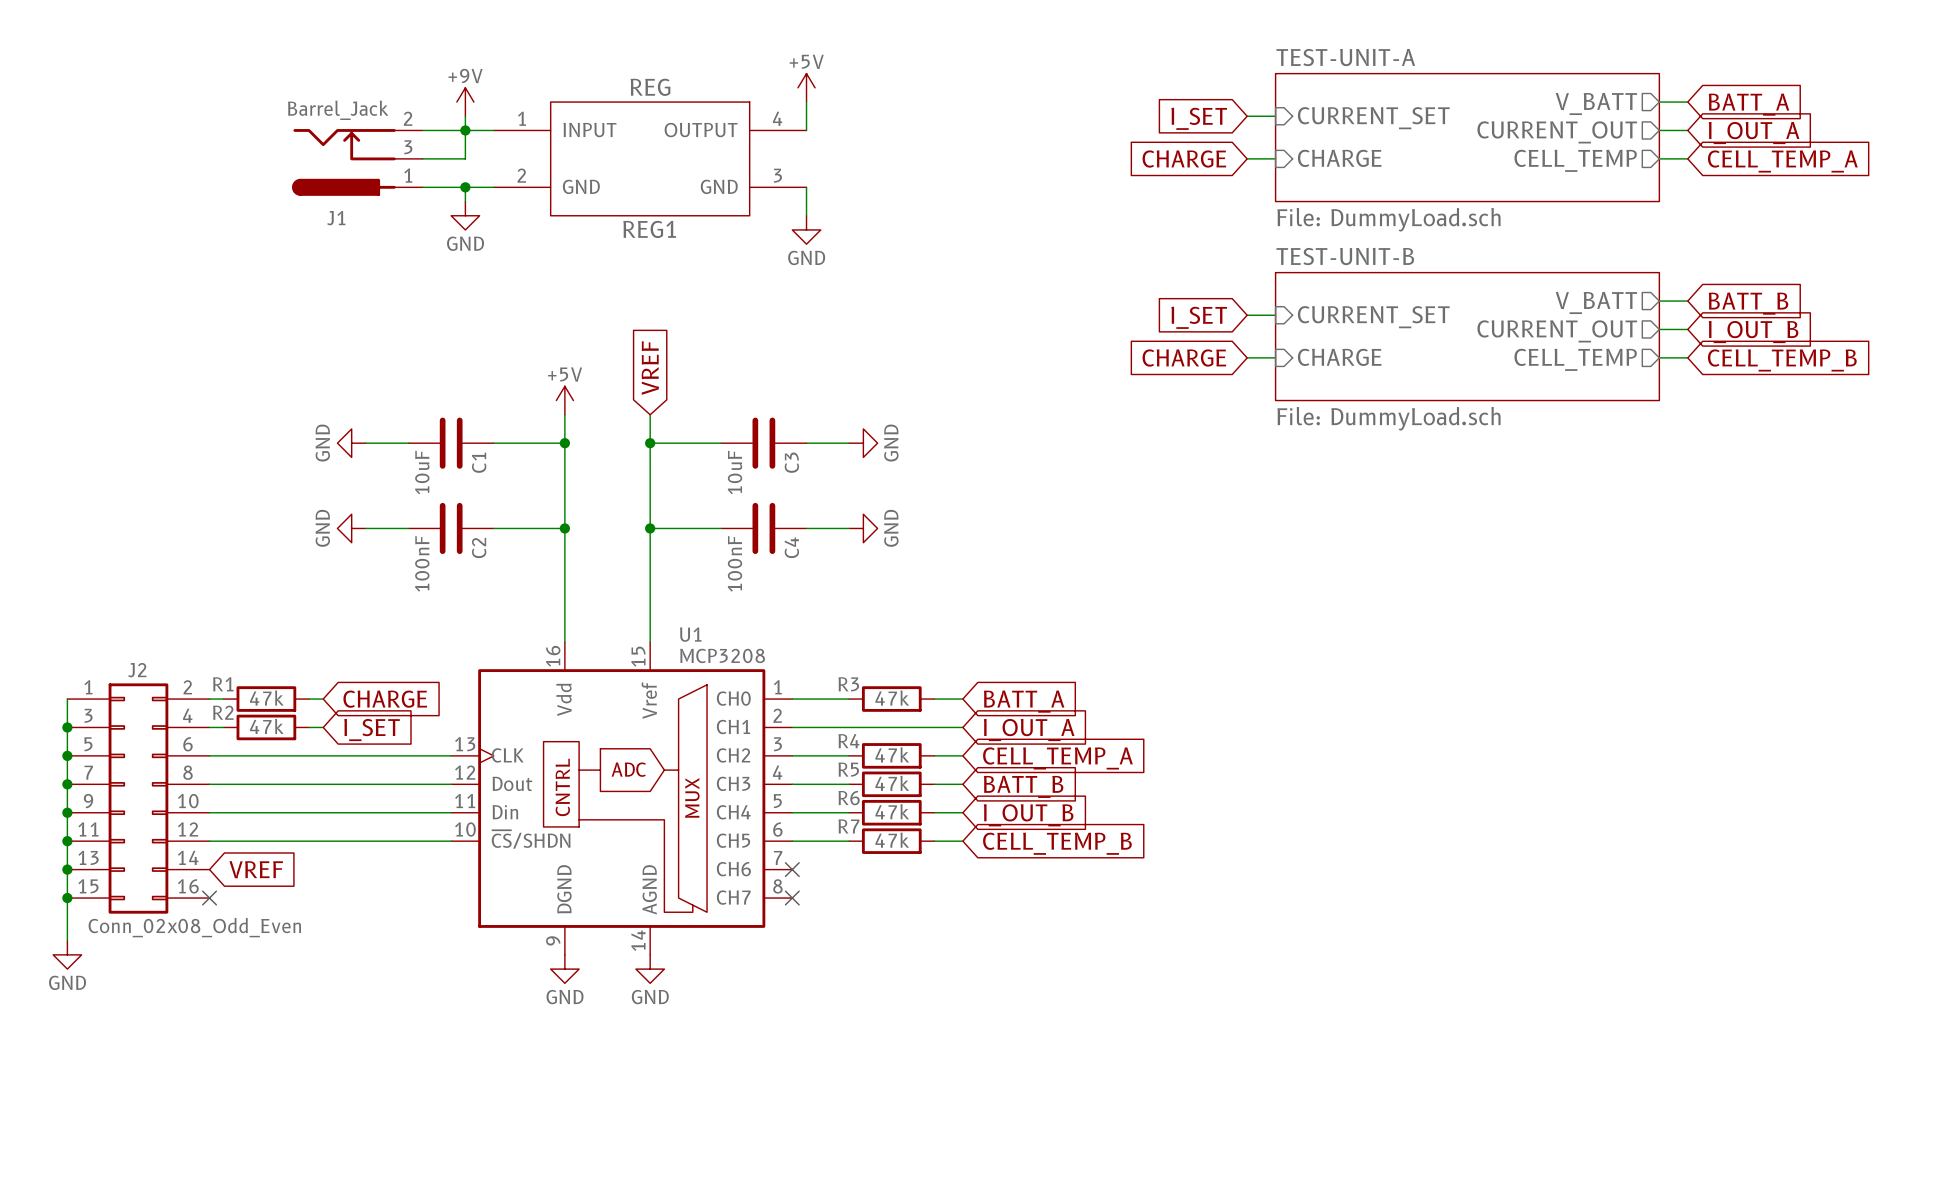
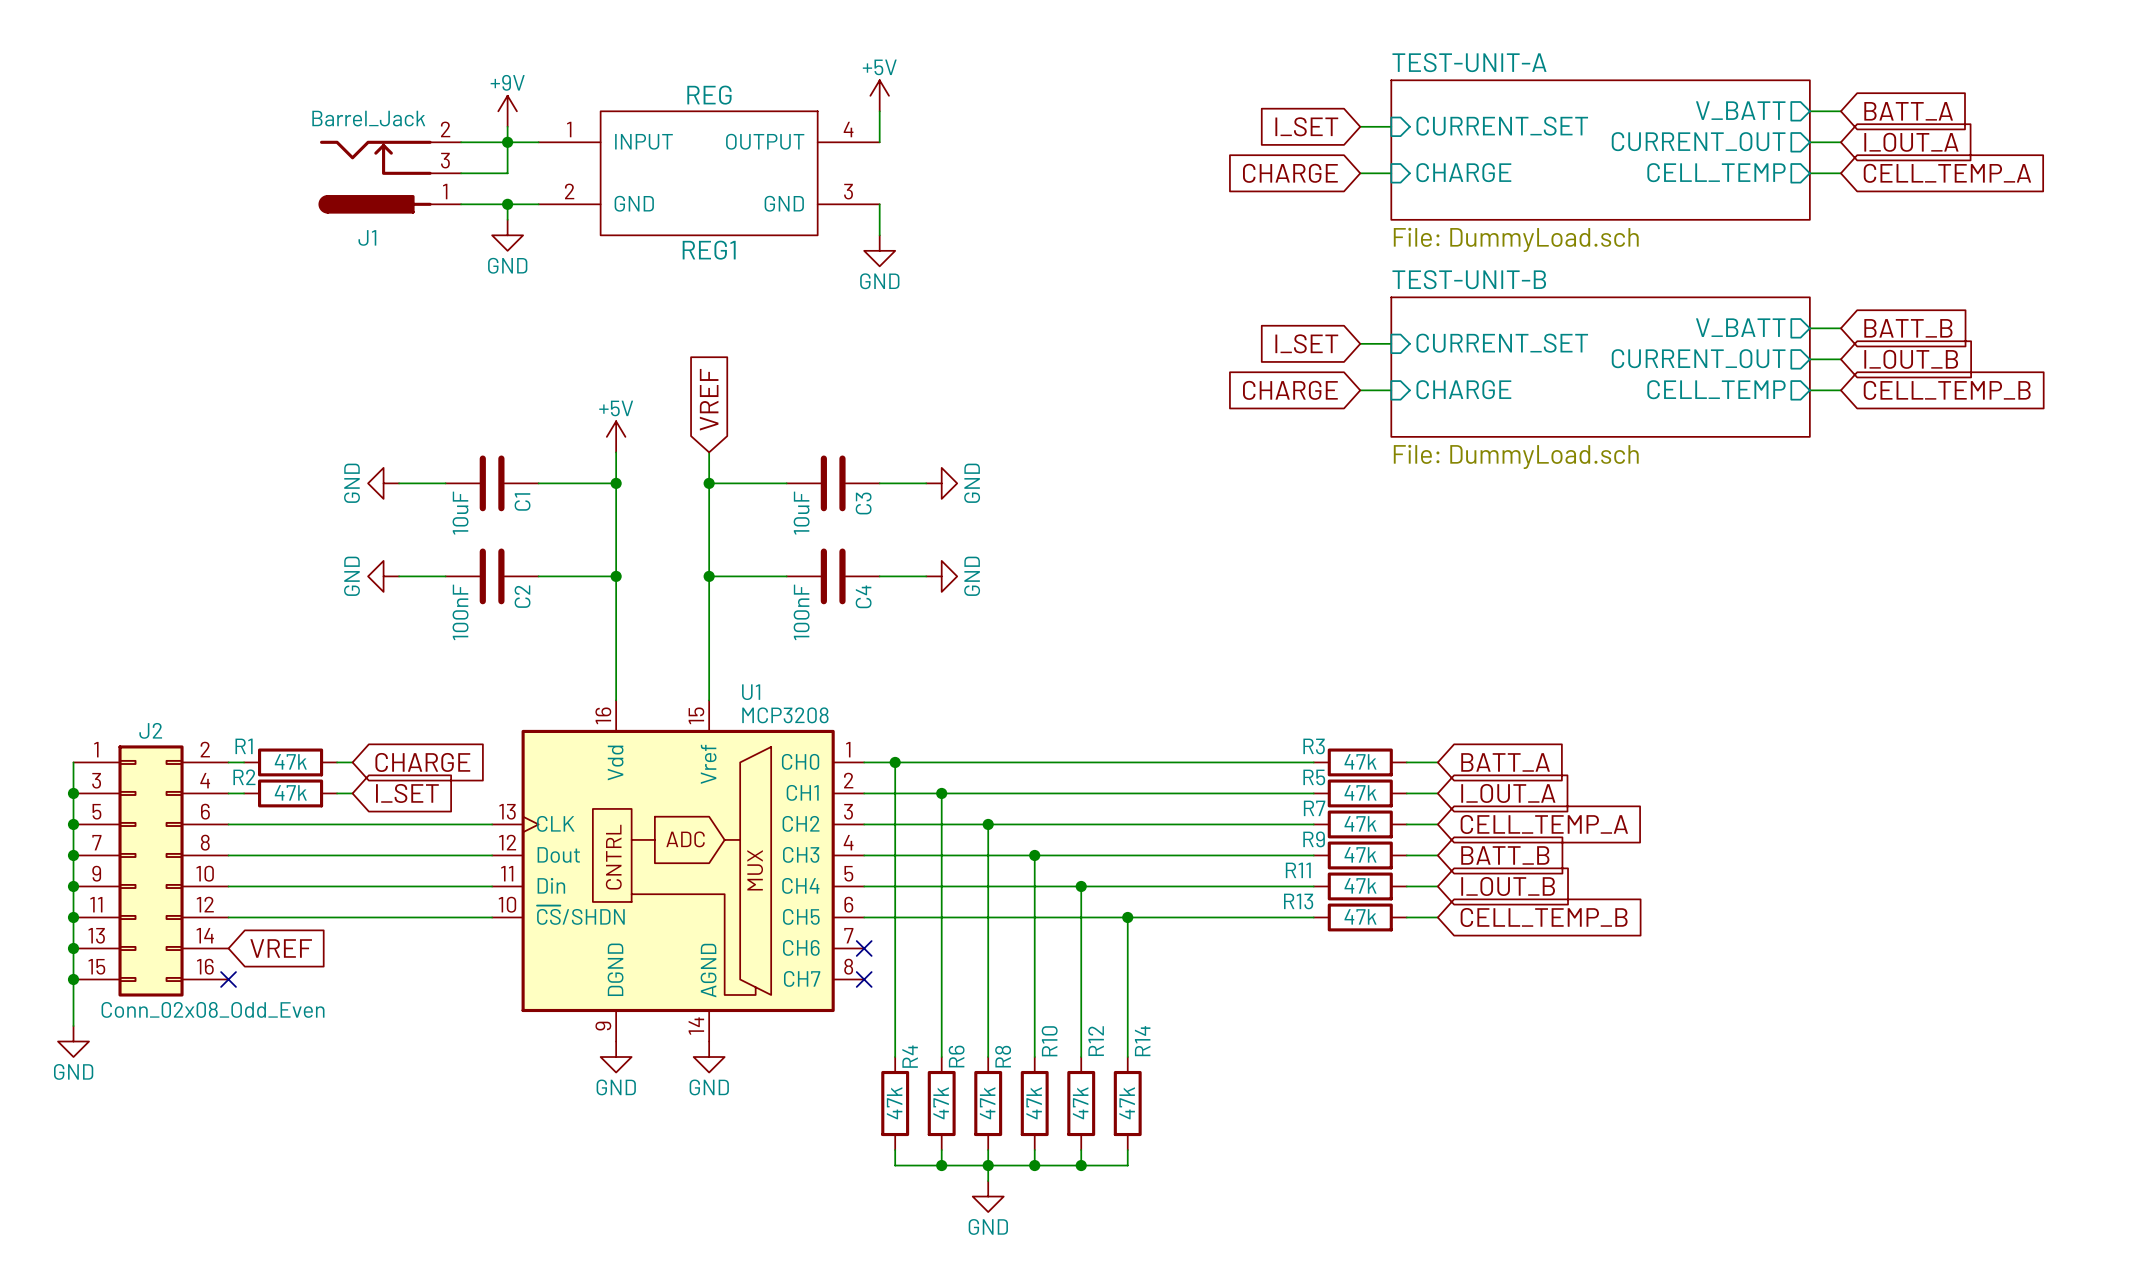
wire: none -> (895, 762) (895, 1057)
junction: none -> (895, 762)
wire: none -> (926, 762) (1019, 762)
R3 position: (891, 699) -> (1360, 762)
wire: none -> (1050, 762) (1313, 762)
wire: none -> (1406, 762) (1437, 762)
global label: BATT_A (1024, 701) -> none
global label: none -> BATT_A (1505, 762)
wire: none -> (941, 793) (941, 1057)
junction: none -> (941, 793)
wire: none -> (1050, 793) (1313, 793)
wire: none -> (1406, 793) (1437, 793)
global label: I_OUT_A (1029, 730) -> none
global label: none -> I_OUT_A (1508, 793)
wire: none -> (926, 824) (1019, 824)
R4 rotation: 0° (891, 755) -> 90° clockwise (895, 1103)
R4 position: (891, 755) -> (895, 1103)
wire: none -> (988, 824) (988, 1057)
junction: none -> (988, 824)
wire: none -> (1050, 824) (1313, 824)
wire: none -> (1406, 824) (1437, 824)
global label: CELL_TEMP_A (1057, 758) -> none
global label: none -> CELL_TEMP_A (1544, 824)
wire: none -> (926, 855) (1019, 855)
R5 position: (891, 784) -> (1360, 793)
wire: none -> (1034, 855) (1034, 1057)
junction: none -> (1034, 855)
wire: none -> (1050, 855) (1313, 855)
R9: none -> 47k (1360, 855)
wire: none -> (1406, 855) (1437, 855)
global label: BATT_B (1023, 786) -> none
global label: none -> BATT_B (1505, 855)
wire: none -> (926, 886) (1019, 886)
R6 rotation: 0° (891, 812) -> 90° clockwise (941, 1103)
R6 position: (891, 812) -> (941, 1103)
wire: none -> (1050, 886) (1313, 886)
wire: none -> (1081, 886) (1081, 1057)
junction: none -> (1081, 886)
R11: none -> 47k (1360, 886)
wire: none -> (1406, 886) (1437, 886)
global label: I_OUT_B (1028, 815) -> none
global label: none -> I_OUT_B (1508, 886)
wire: none -> (926, 917) (1019, 917)
R7 position: (891, 841) -> (1360, 824)
wire: none -> (1050, 917) (1313, 917)
wire: none -> (1127, 917) (1127, 1057)
junction: none -> (1127, 917)
R13: none -> 47k (1360, 917)
wire: none -> (1406, 917) (1437, 917)
global label: CELL_TEMP_B (1057, 843) -> none
global label: none -> CELL_TEMP_B (1544, 917)
R8: none -> 47k (988, 1103)
R10: none -> 47k (1034, 1103)
R12: none -> 47k (1081, 1103)
R14: none -> 47k (1127, 1103)
wire: none -> (895, 1150) (895, 1165) (1127, 1165) (1127, 1150)
wire: none -> (941, 1150) (941, 1165)
wire: none -> (988, 1150) (988, 1181)
wire: none -> (1034, 1150) (1034, 1165)
wire: none -> (1081, 1150) (1081, 1165)
junction: none -> (941, 1165)
junction: none -> (988, 1165)
junction: none -> (1034, 1165)
junction: none -> (1081, 1165)
power symbol: none -> GND (988, 1196)

